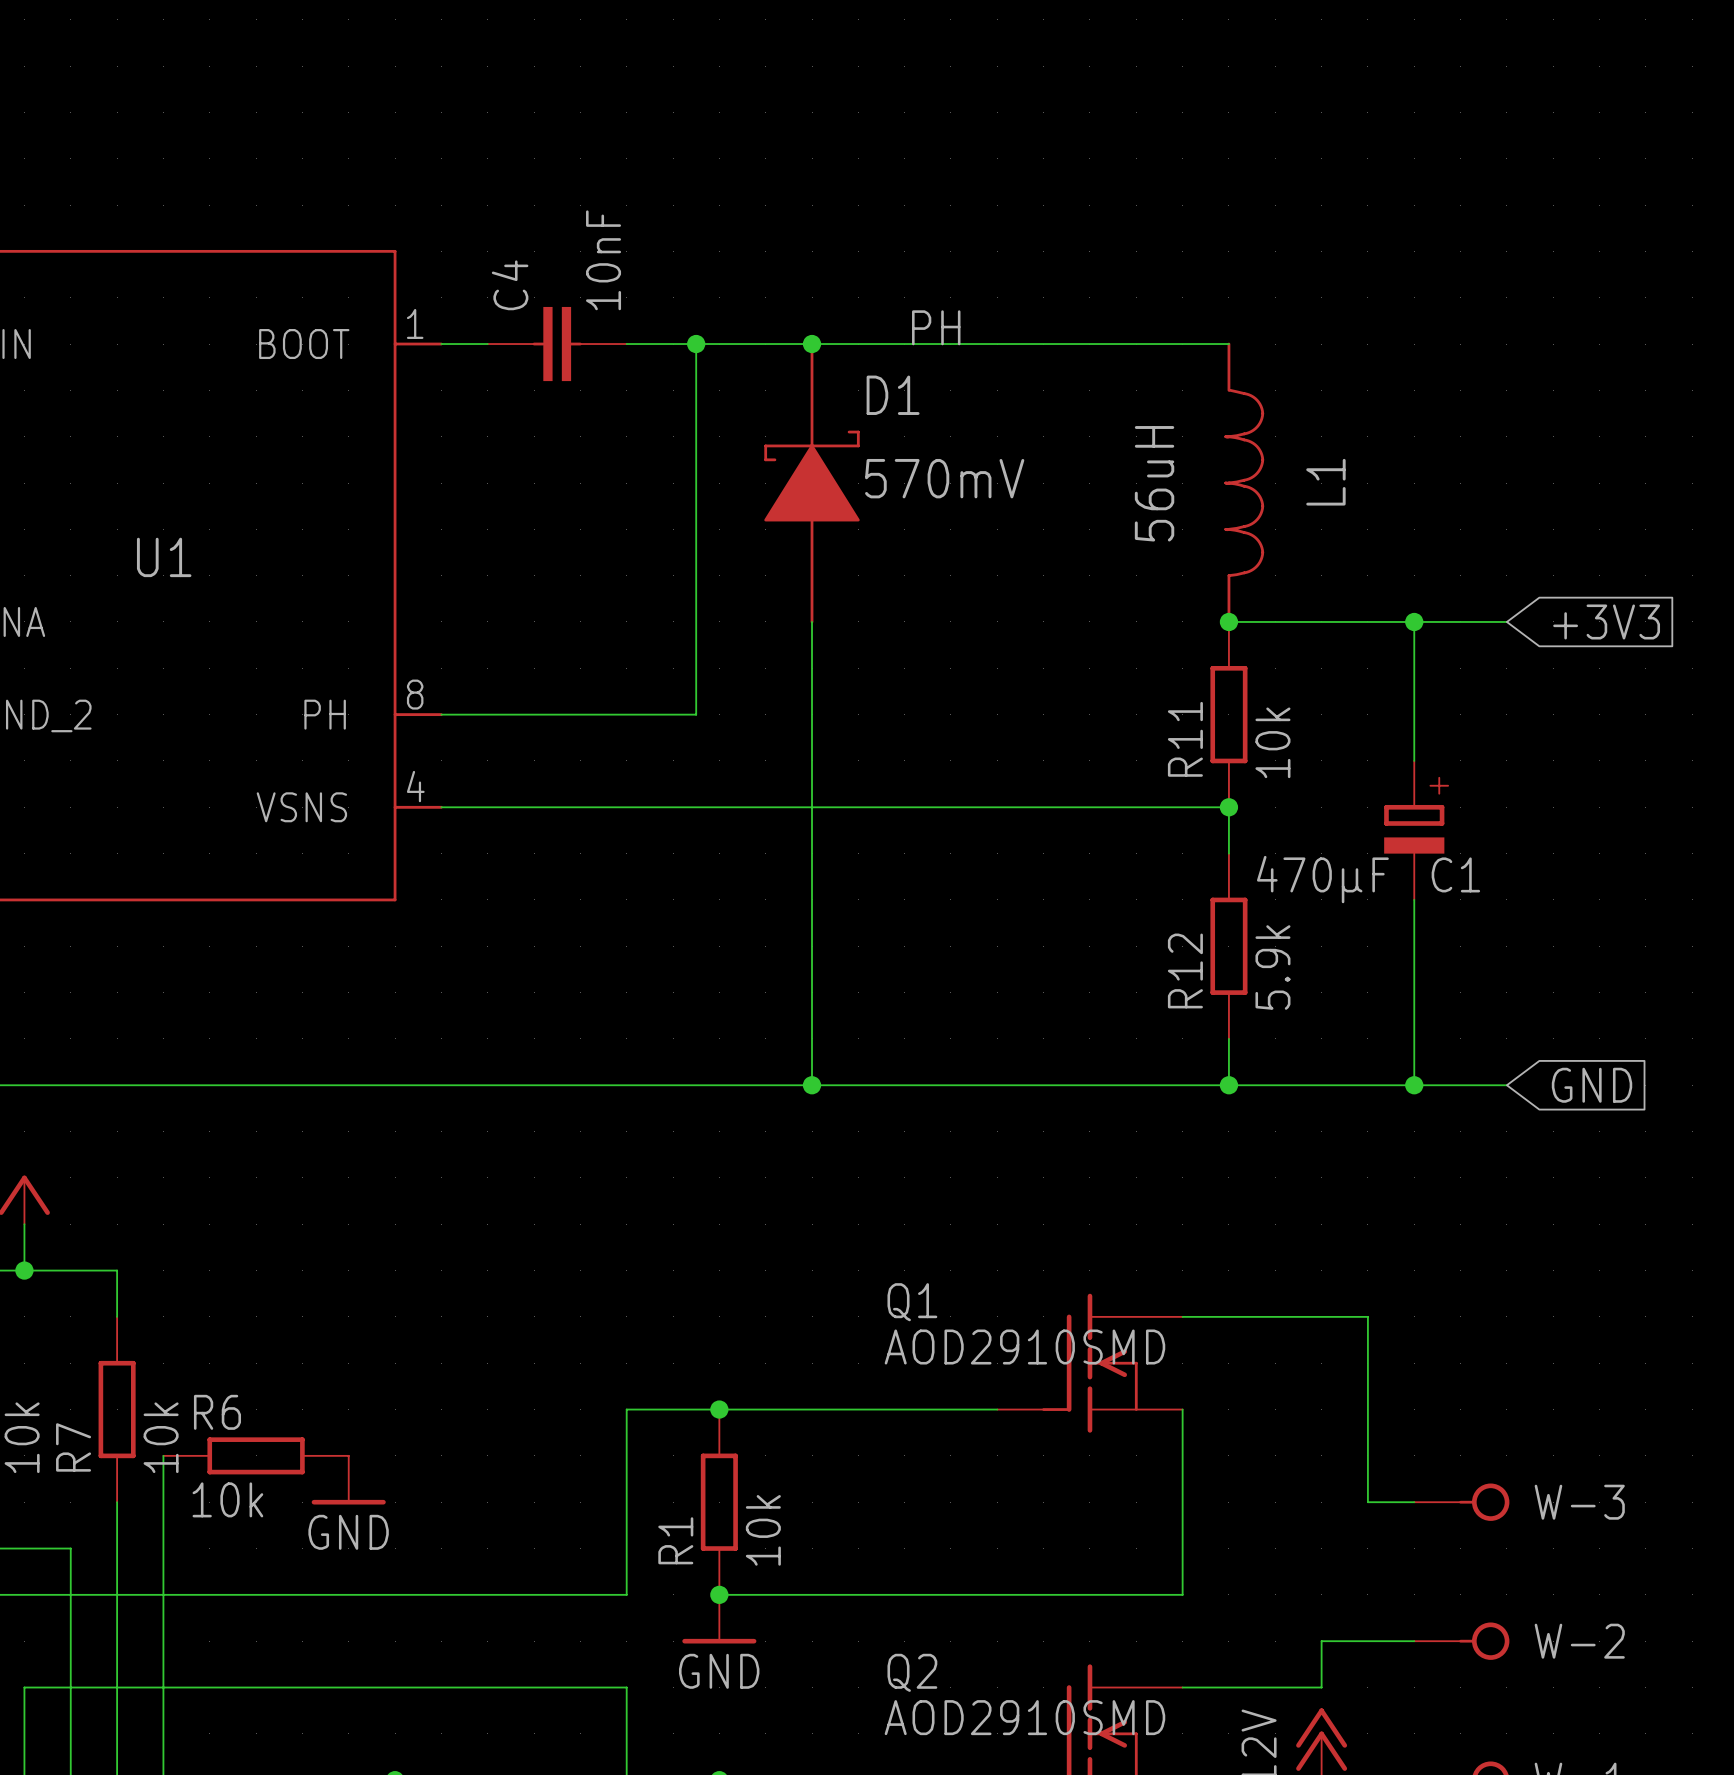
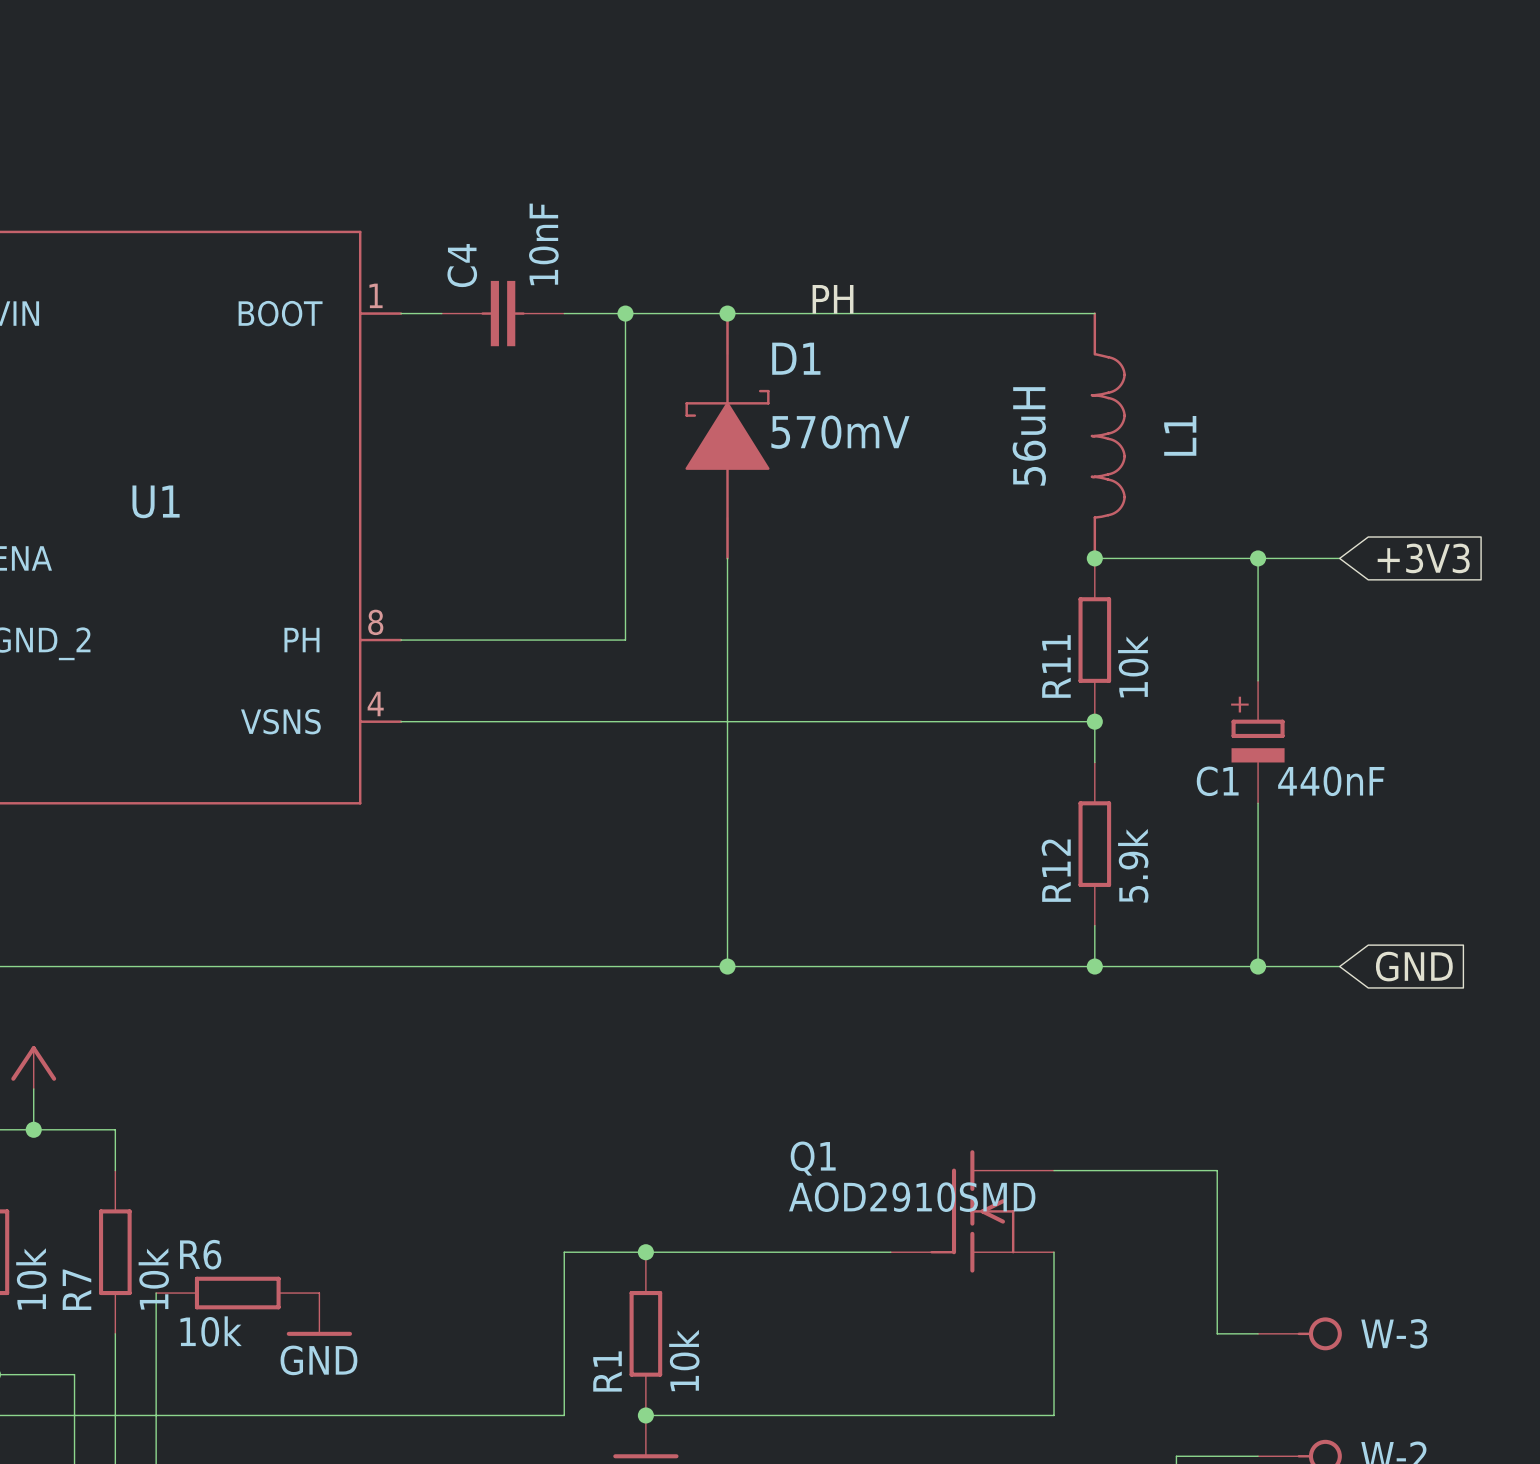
C1 text position: + (1439, 785) -> + (1239, 704)
C1 name position: C1 (1455, 874) -> C1 (1217, 781)
C1 value: 470µF (1322, 879) -> 440nF (1331, 781)

